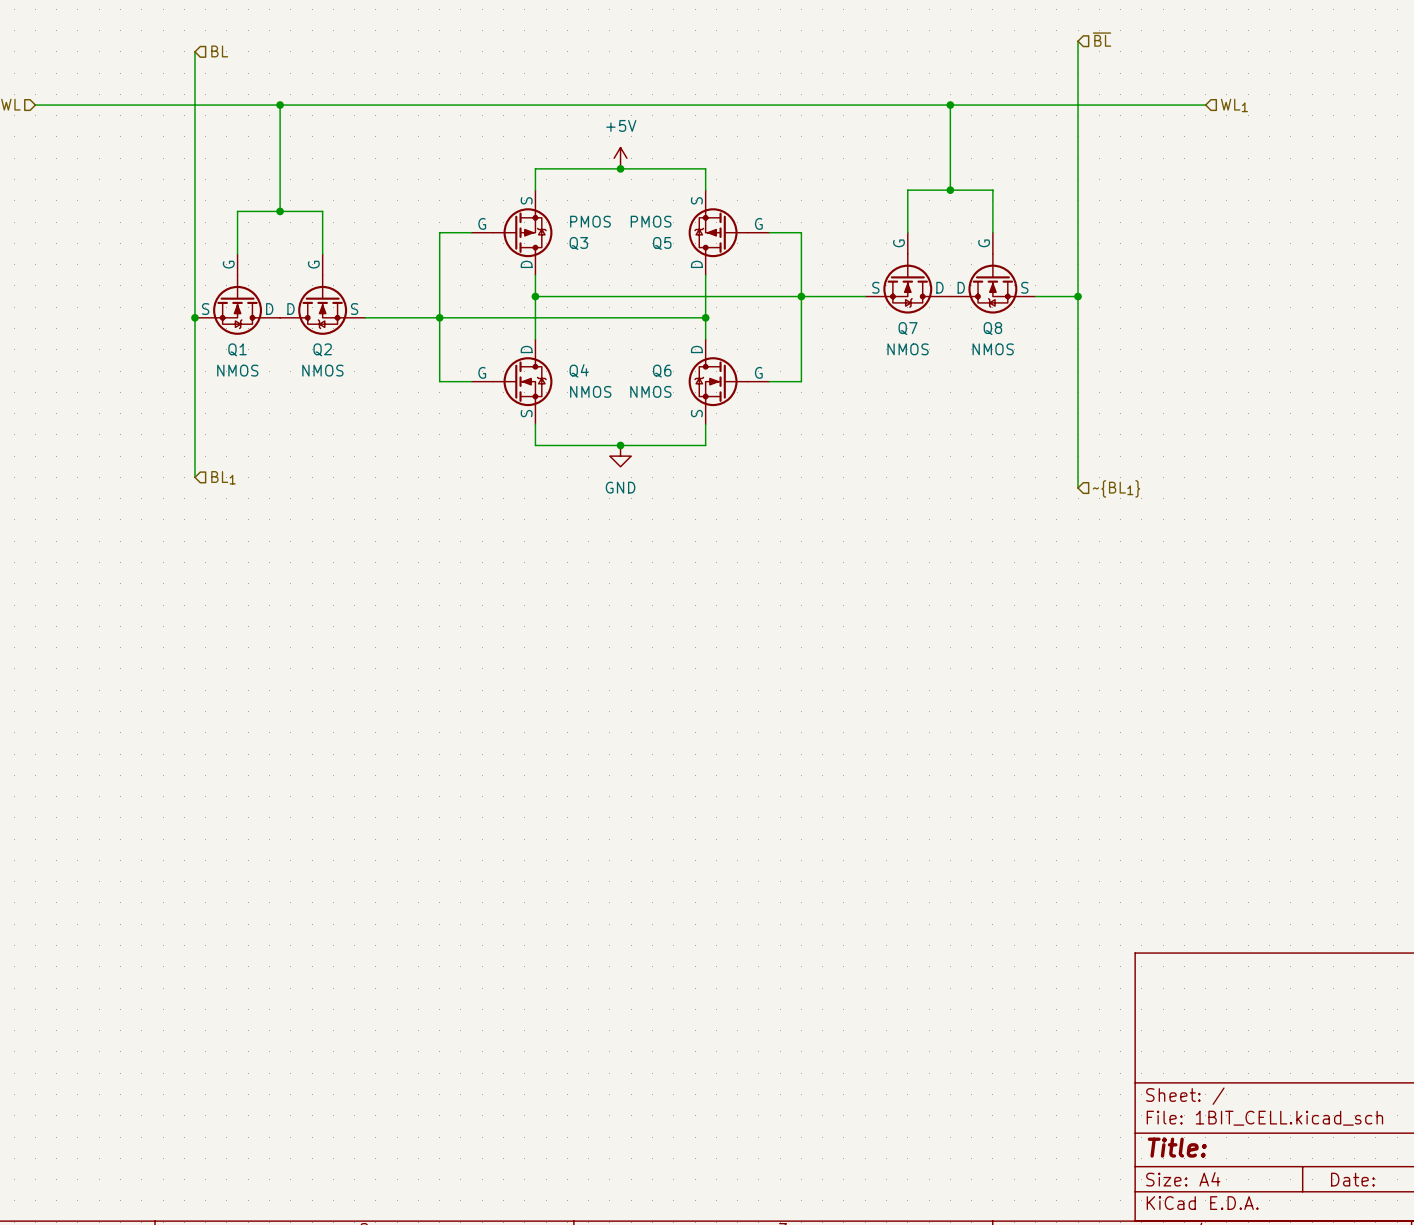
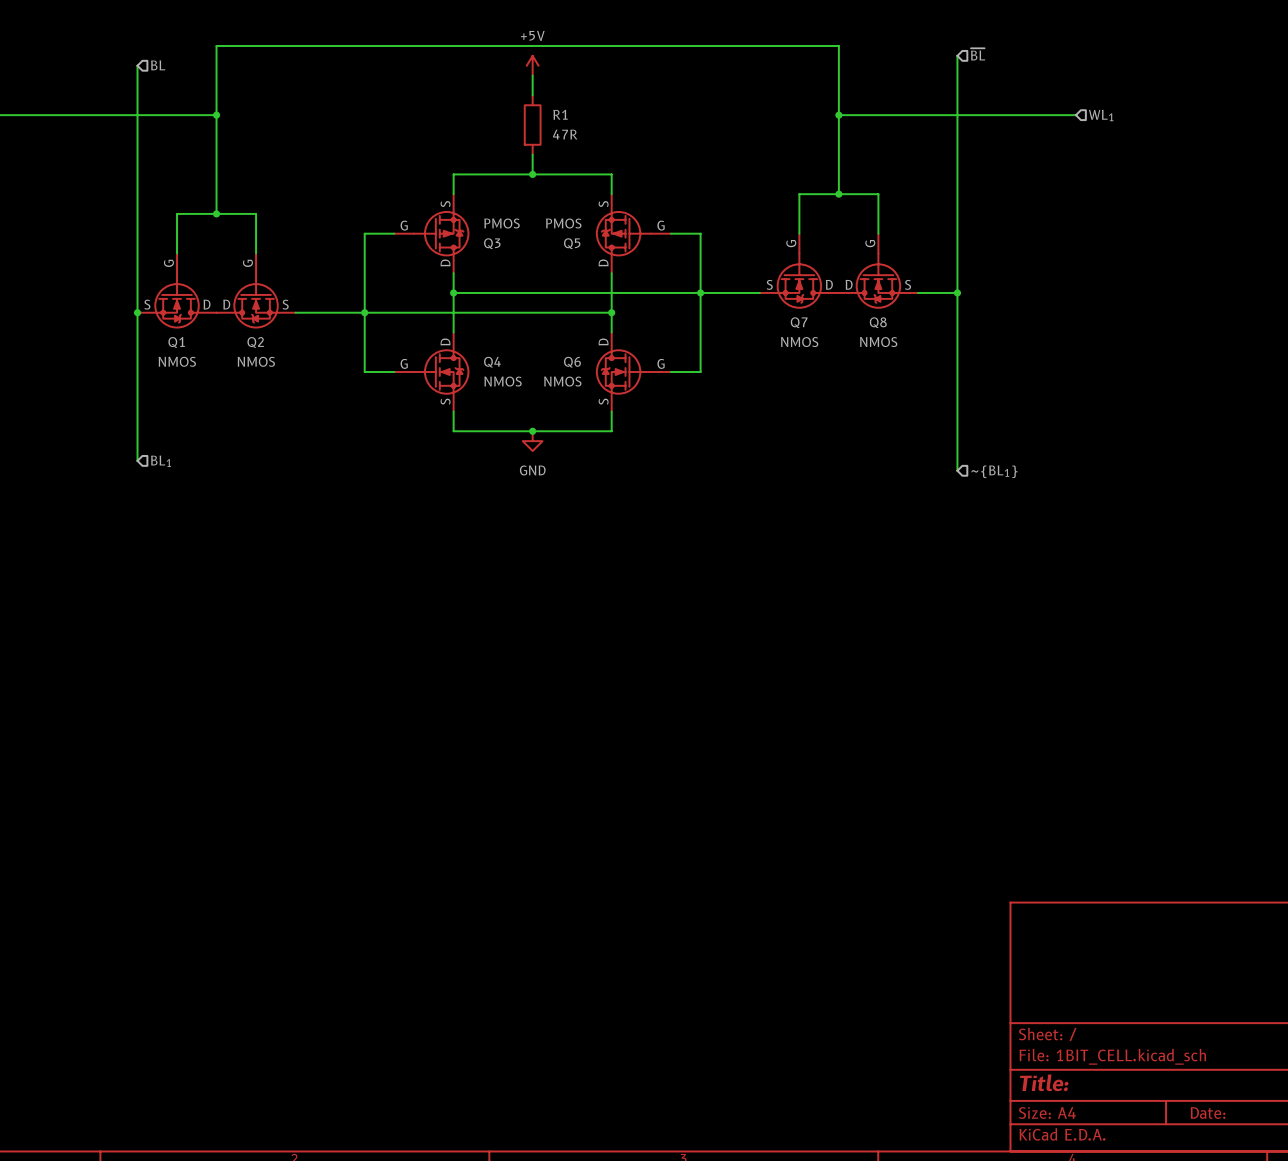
wire: none -> (532, 75) (532, 95)
wire: (280, 105) (950, 105) -> (216, 115) (216, 46) (838, 46) (838, 115)
R1: none -> 47R (532, 125)
power symbol position: +5V (620, 158) -> +5V (532, 65)

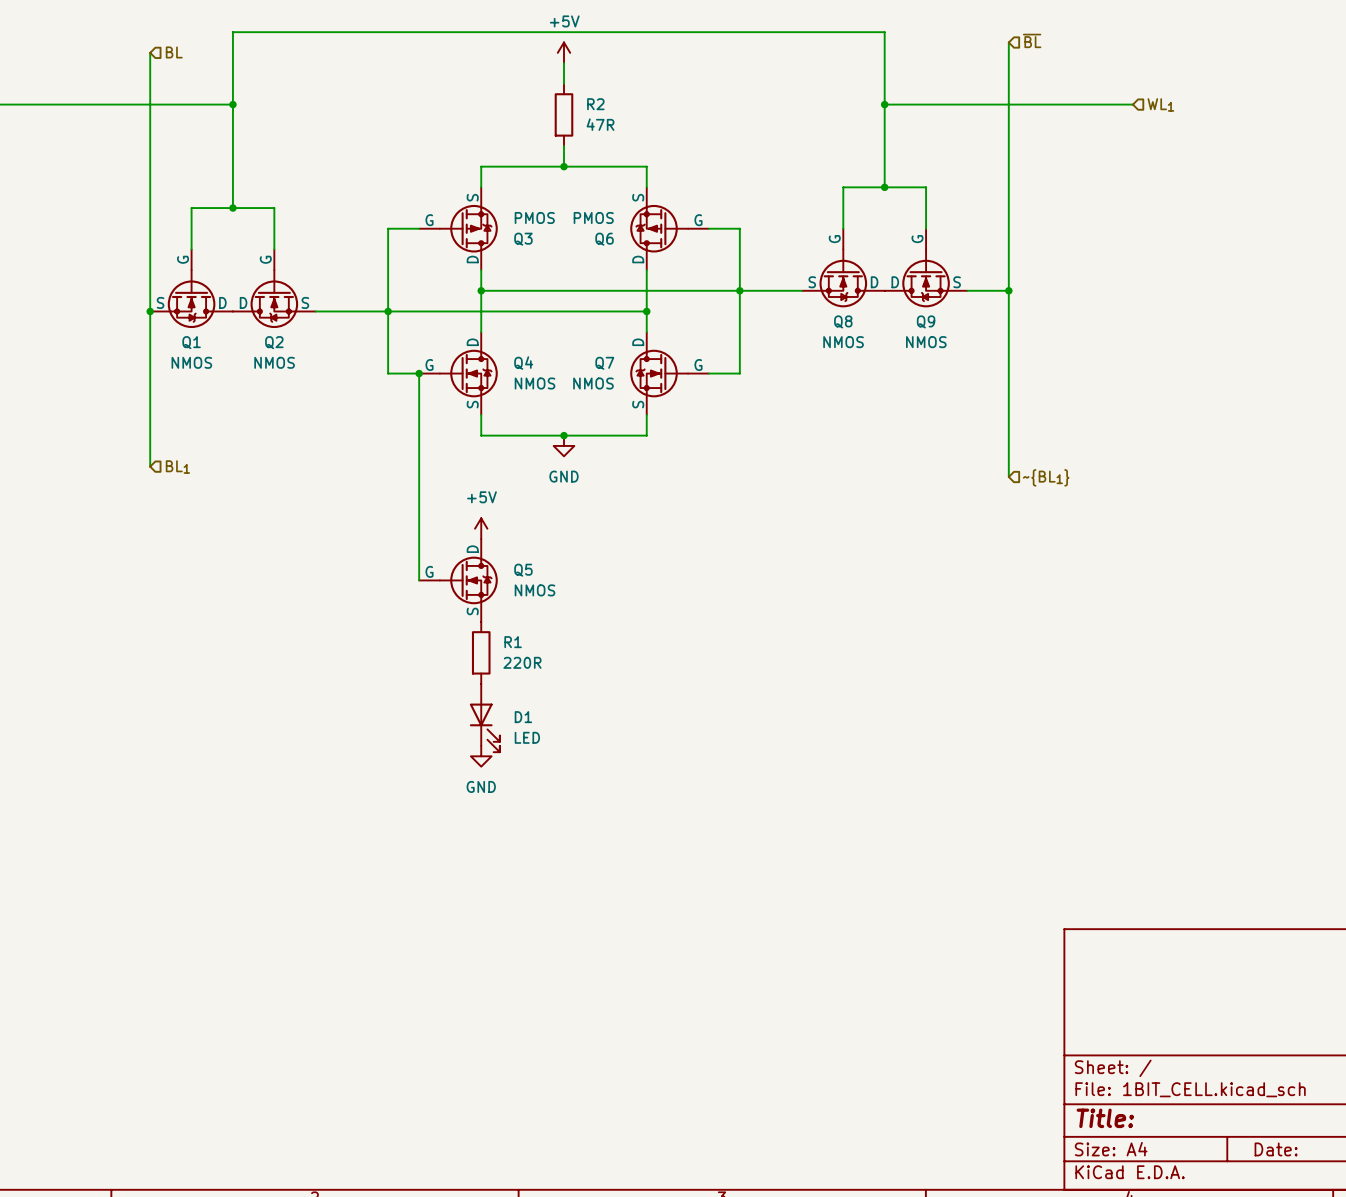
R1 name: R1 (560, 114) -> R2 (595, 104)
Q5 name: Q5 (572, 243) -> Q6 (604, 239)
Q7 name: Q7 (799, 322) -> Q8 (843, 321)
Q8 name: Q8 (878, 322) -> Q9 (926, 321)
Q6 name: Q6 (572, 362) -> Q7 (604, 363)
wire: none -> (419, 373) (419, 580)
junction: none -> (419, 373)
power symbol: none -> +5V (481, 528)
Q5: none -> NMOS (458, 580)
R1: none -> 220R (481, 652)
D1: none -> LED (484, 718)
power symbol: none -> GND (481, 756)

